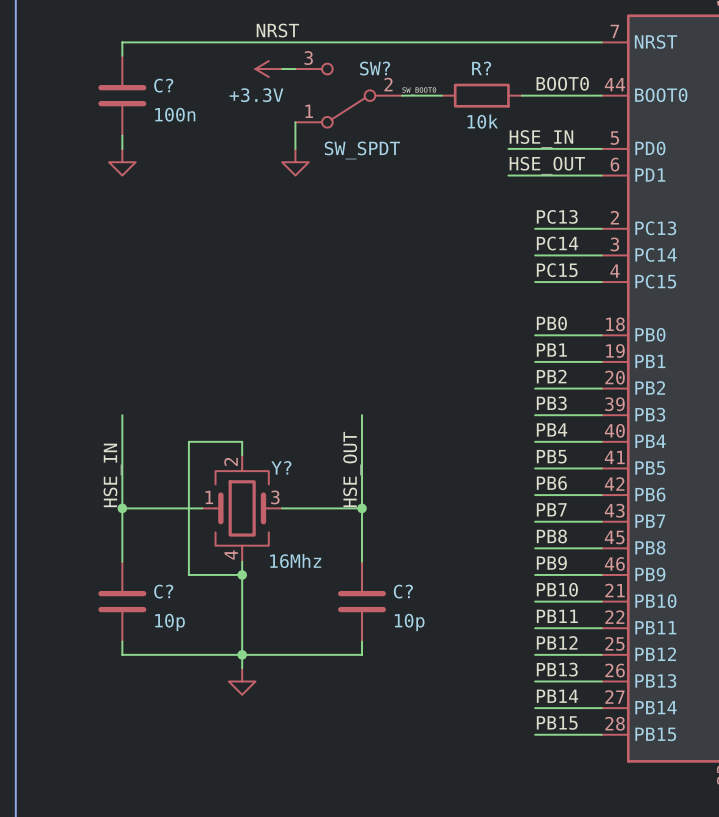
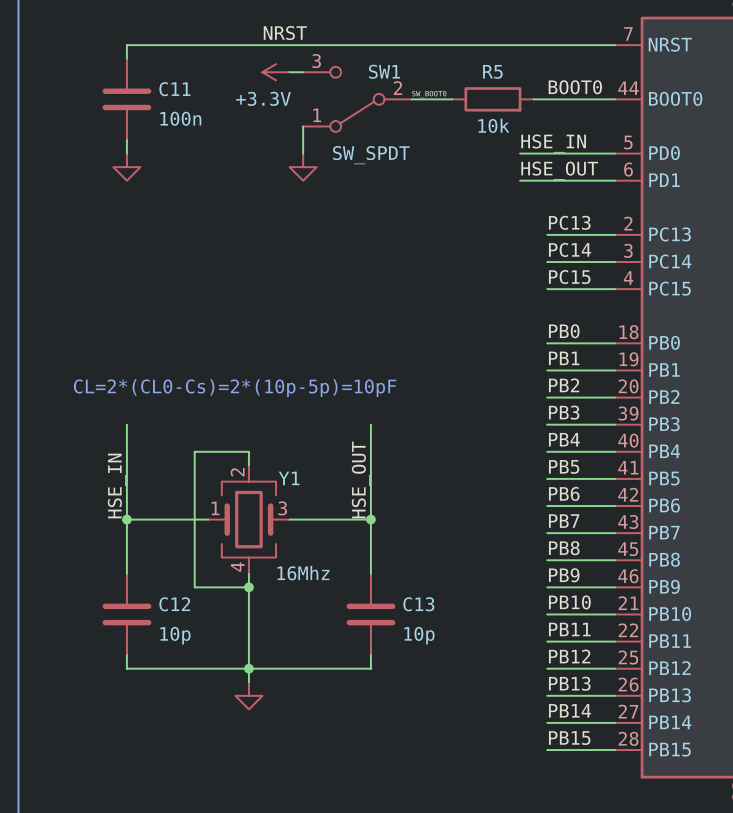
SW? name: SW? (375, 68) -> SW1 (384, 71)
R? name: R? (481, 68) -> R5 (492, 71)
C? name: C? (163, 85) -> C11 (174, 89)
text: none -> CL=2*(CL0-Cs)=2*(10p-5p)=10pF (235, 388)
Y? name: Y? (281, 467) -> Y1 (289, 478)
C? name: C? (163, 591) -> C12 (174, 604)
C? name: C? (403, 591) -> C13 (418, 604)

